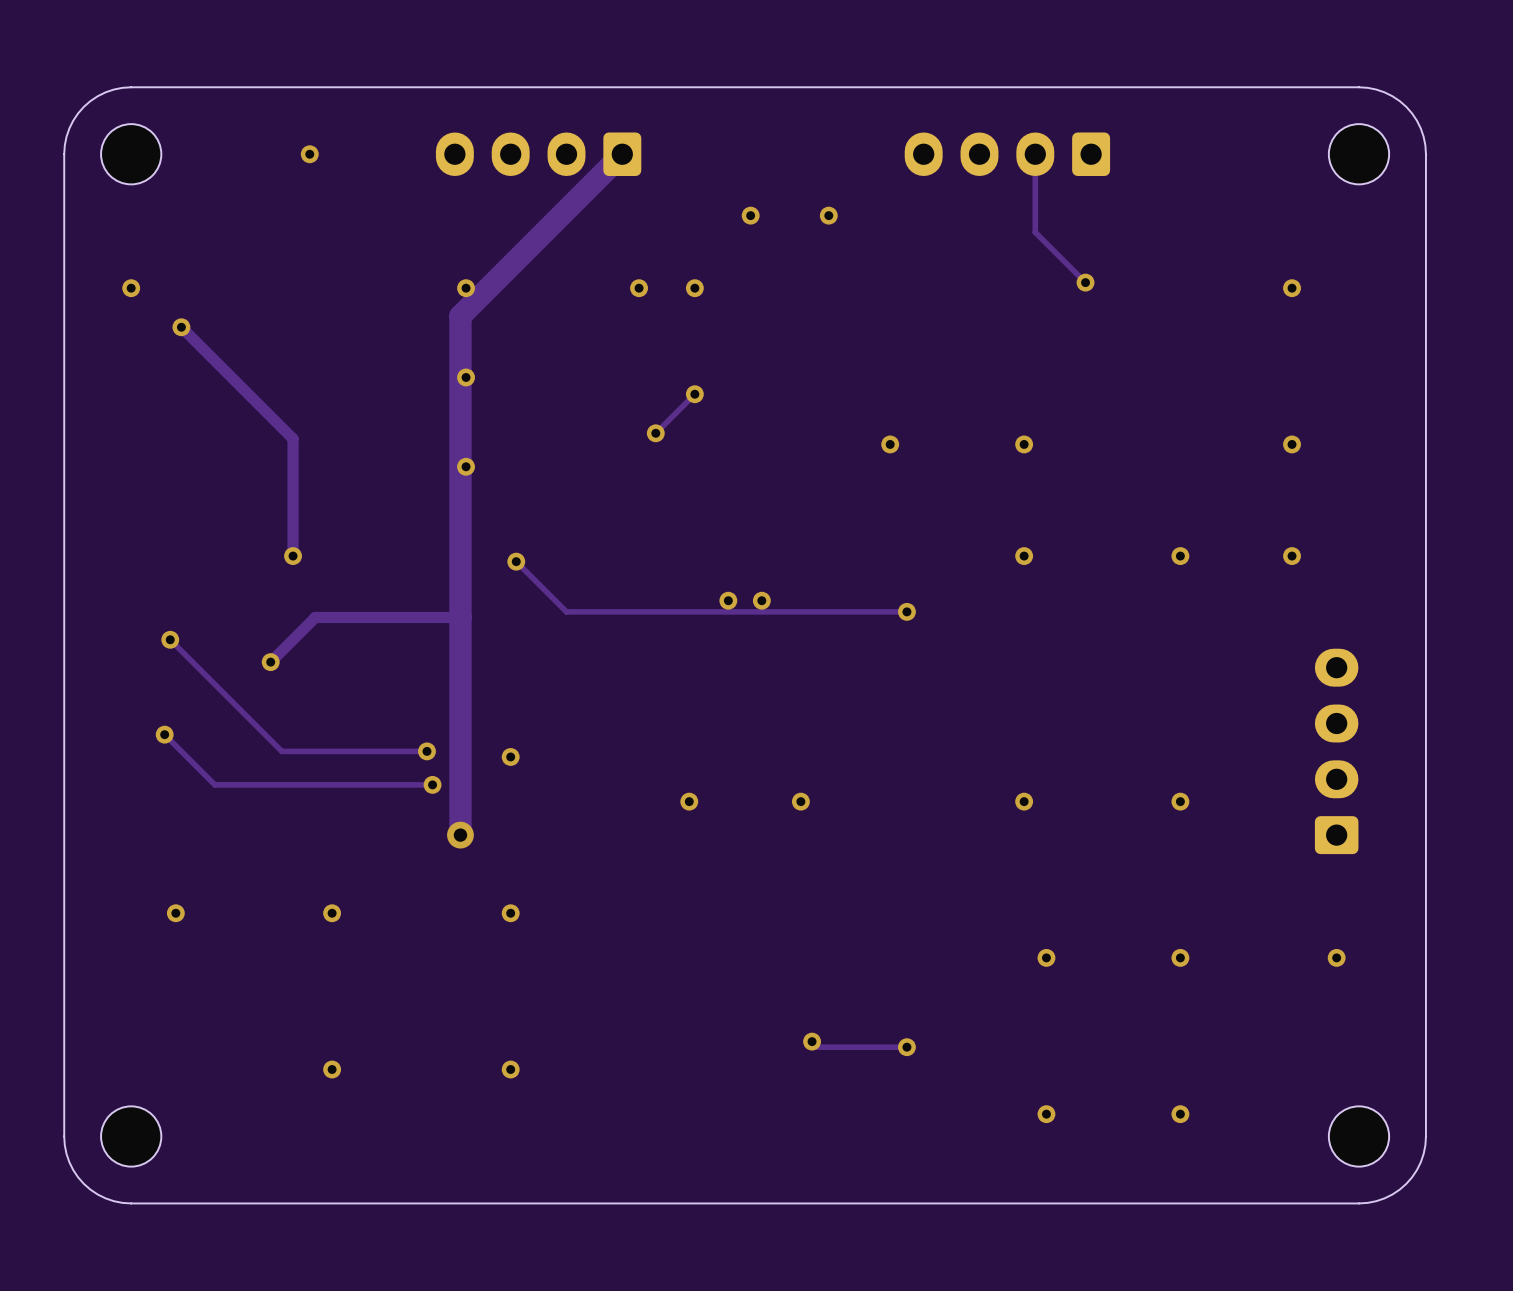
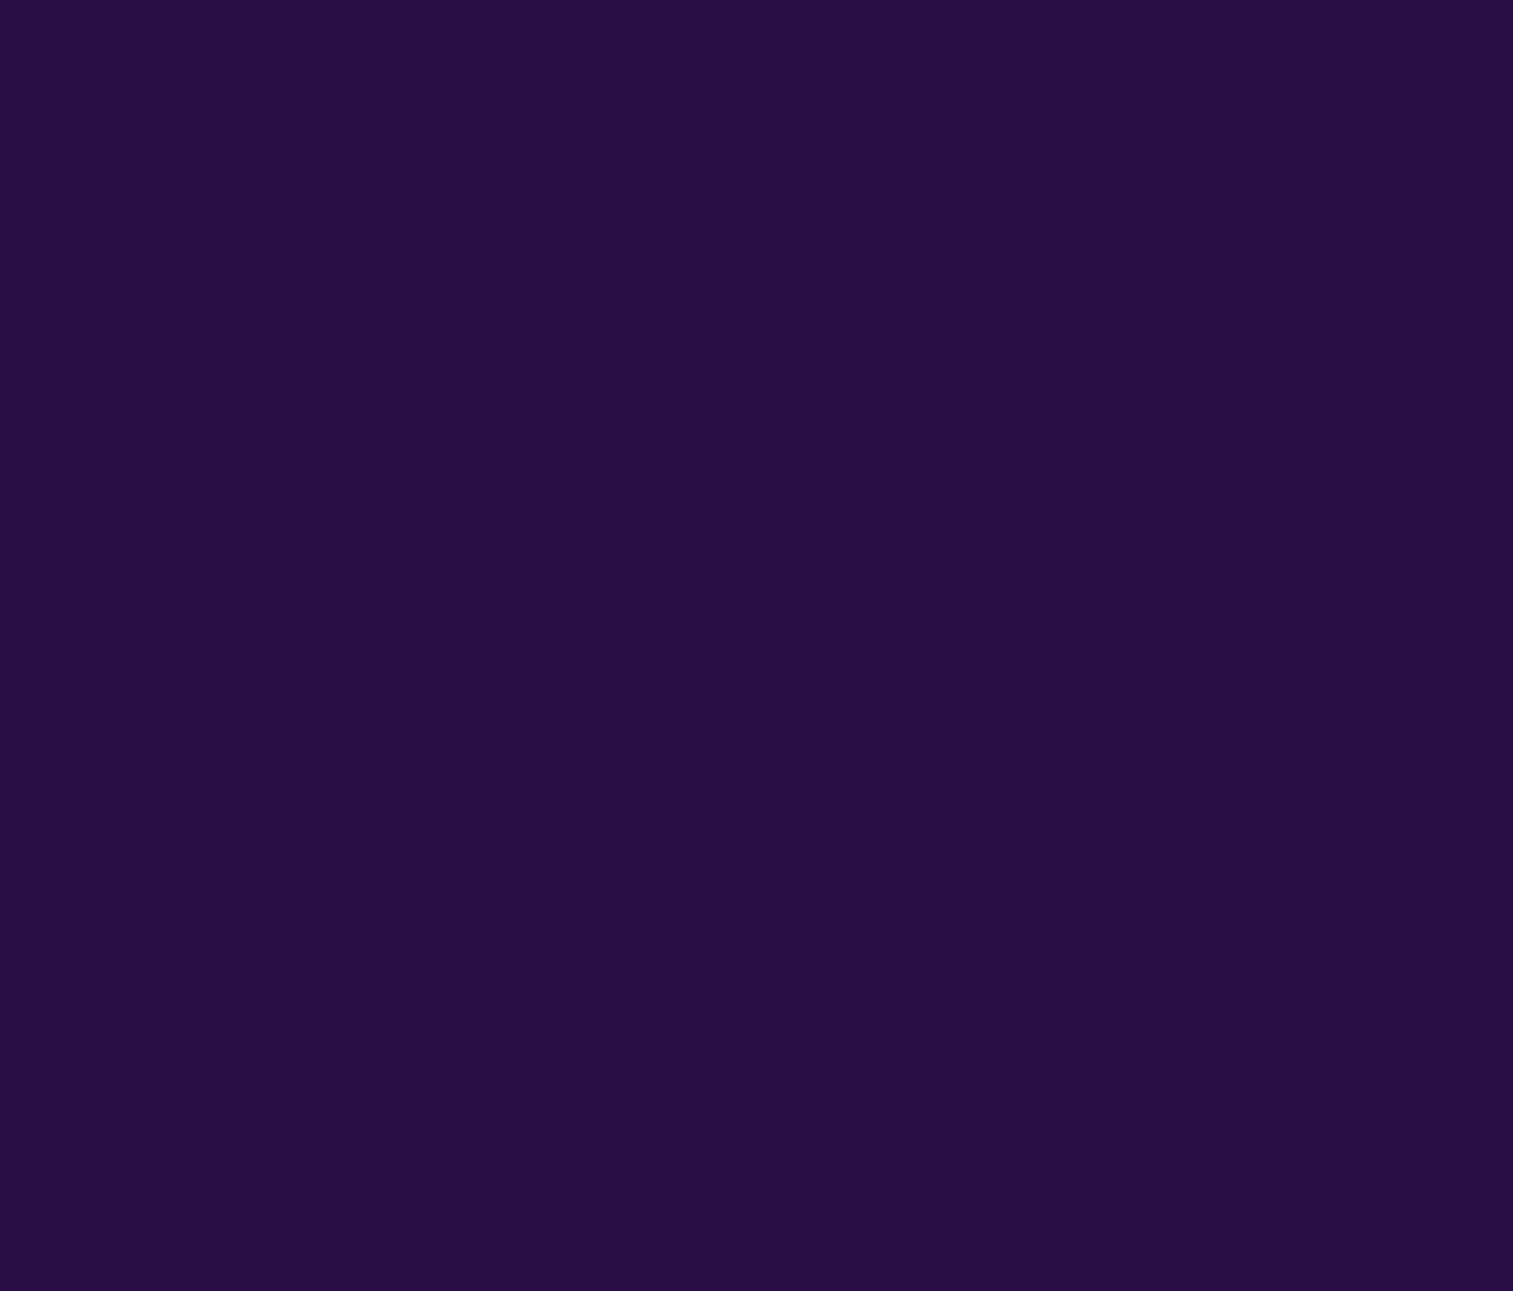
board edge: (1358, 87) (131, 87) (113, 89) (90, 101) (78, 113) (69, 128) (64, 154) (64, 1136) (69, 1162) (78, 1177) (90, 1189) (105, 1198) (131, 1203) (1358, 1203) (1376, 1201) (1399, 1189) (1412, 1177) (1420, 1162) (1425, 1136) (1425, 154) (1420, 128) (1406, 106) (1384, 92) (1358, 87) -> none
part: (131, 154) -> none
via: (309, 154) -> none
part: (538, 154) -> none
track: (622, 154) (460, 316) (460, 835) -> none
part: (1007, 154) -> none
track: (1035, 154) (1035, 232) (1085, 282) -> none
part: (1358, 154) -> none
via: (750, 215) -> none
via: (828, 215) -> none
via: (1085, 282) -> none
via: (131, 288) -> none
via: (466, 288) -> none
via: (639, 288) -> none
via: (694, 288) -> none
via: (1292, 288) -> none
track: (181, 327) (293, 438) (293, 556) -> none
via: (181, 327) -> none
via: (466, 377) -> none
track: (694, 394) (655, 433) -> none
via: (694, 394) -> none
via: (655, 433) -> none
via: (890, 444) -> none
via: (1024, 444) -> none
via: (1292, 444) -> none
via: (466, 466) -> none
via: (293, 556) -> none
via: (1024, 556) -> none
via: (1180, 556) -> none
via: (1292, 556) -> none
track: (516, 561) (566, 611) (906, 611) -> none
via: (516, 561) -> none
via: (728, 600) -> none
via: (761, 600) -> none
via: (906, 611) -> none
track: (460, 617) (315, 617) (270, 662) -> none
track: (170, 639) (281, 751) (426, 751) -> none
via: (170, 639) -> none
via: (270, 662) -> none
track: (164, 734) (214, 784) (432, 784) -> none
via: (164, 734) -> none
via: (426, 751) -> none
part: (1336, 751) -> none
via: (510, 756) -> none
via: (432, 784) -> none
via: (689, 801) -> none
via: (800, 801) -> none
via: (1024, 801) -> none
via: (1180, 801) -> none
via: (460, 835) -> none
via: (175, 913) -> none
via: (332, 913) -> none
via: (510, 913) -> none
via: (1046, 957) -> none
via: (1180, 957) -> none
via: (1336, 957) -> none
track: (812, 1041) (817, 1047) (906, 1047) -> none
via: (812, 1041) -> none
via: (906, 1047) -> none
via: (332, 1069) -> none
via: (510, 1069) -> none
via: (1046, 1114) -> none
via: (1180, 1114) -> none
part: (131, 1136) -> none
part: (1358, 1136) -> none

